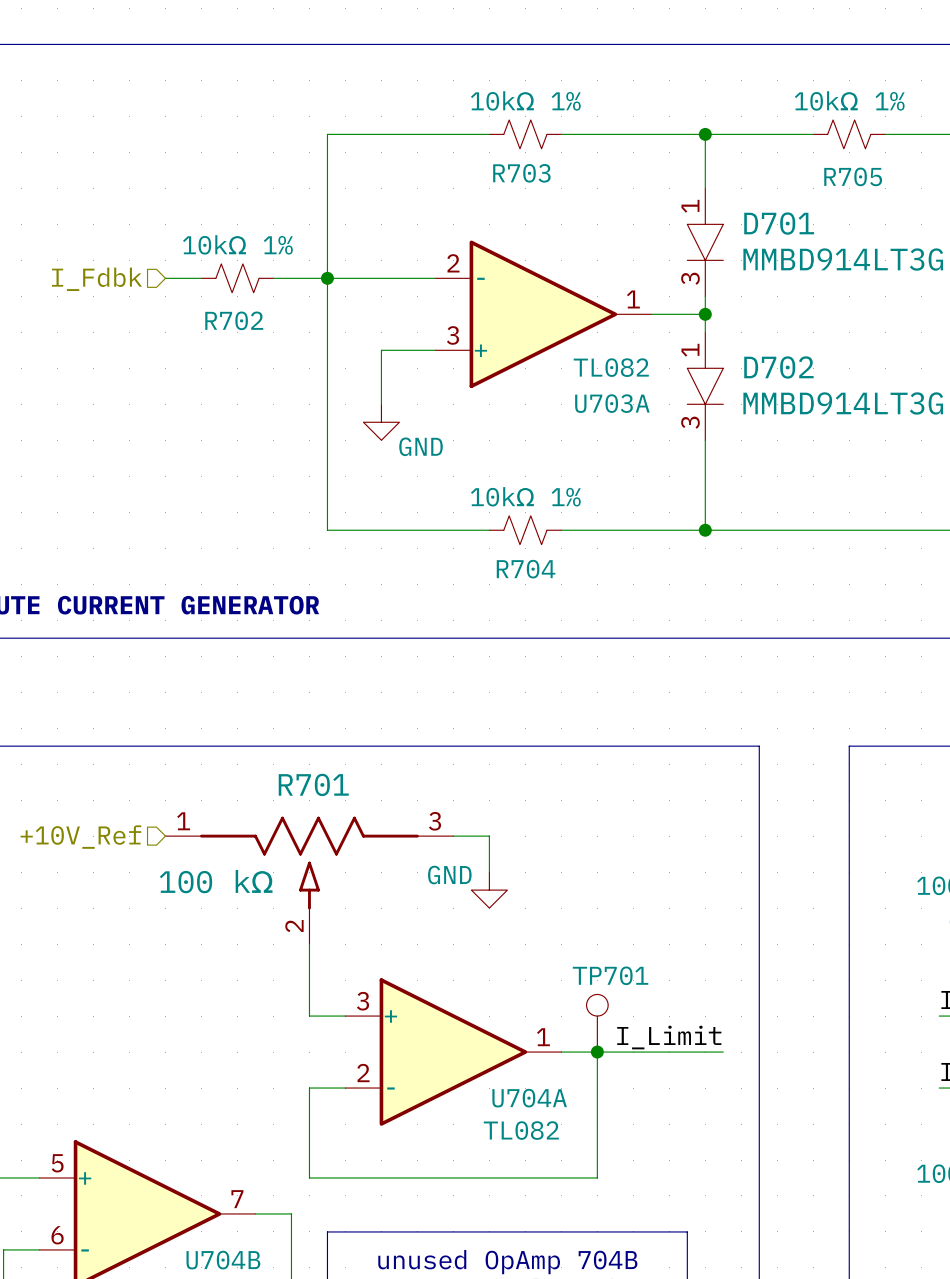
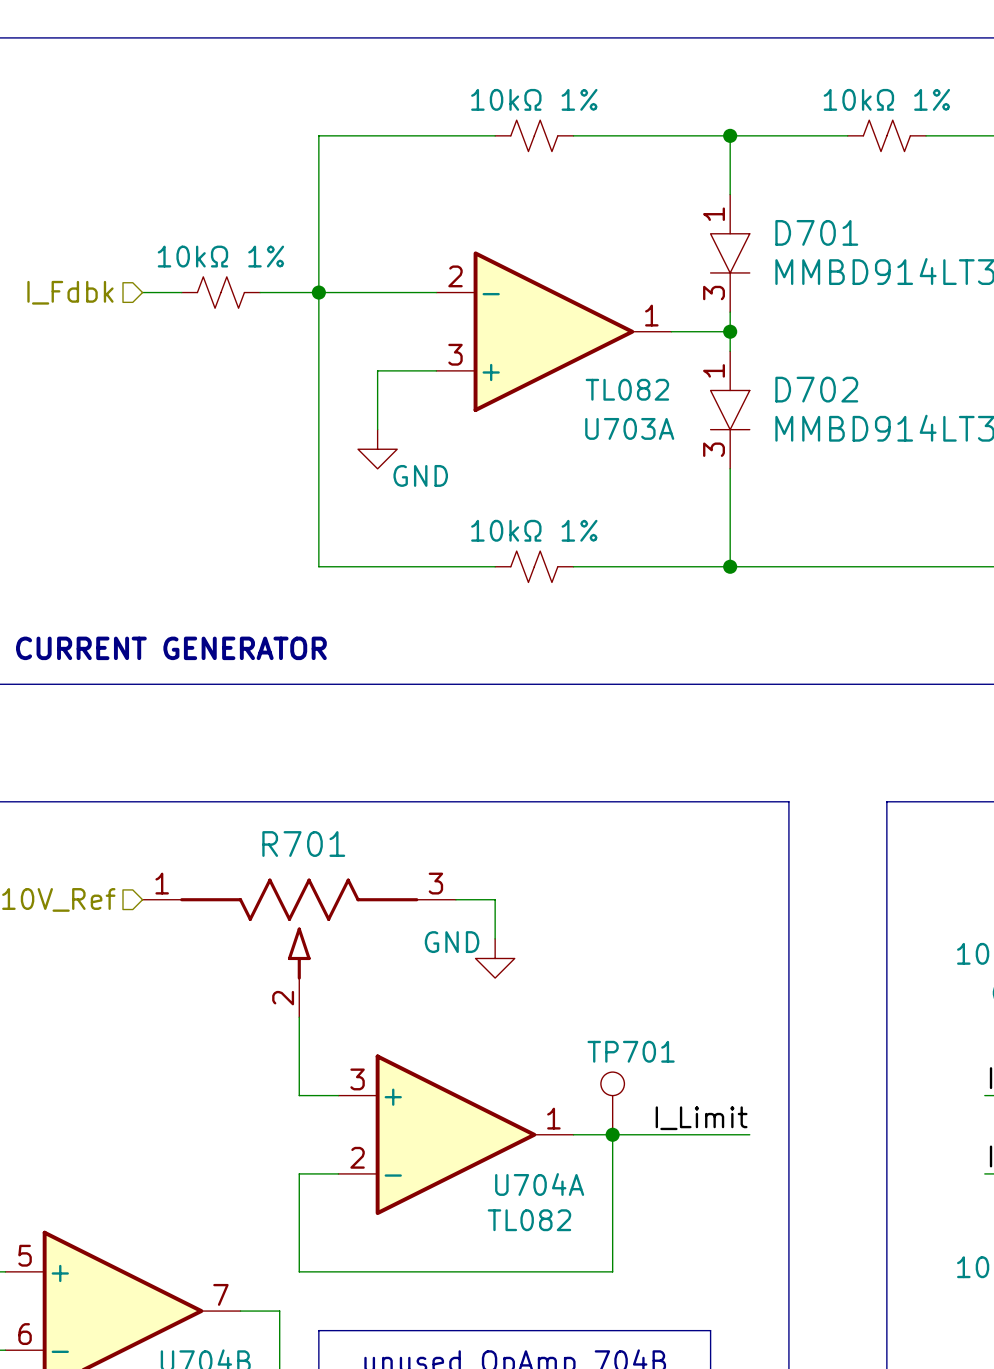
R703 name: R703 (521, 173) -> none
R705 name: R705 (853, 176) -> none
R702 name: R702 (234, 320) -> none
R704 name: R704 (526, 569) -> none
R701 value: 100 kΩ (216, 881) -> none

